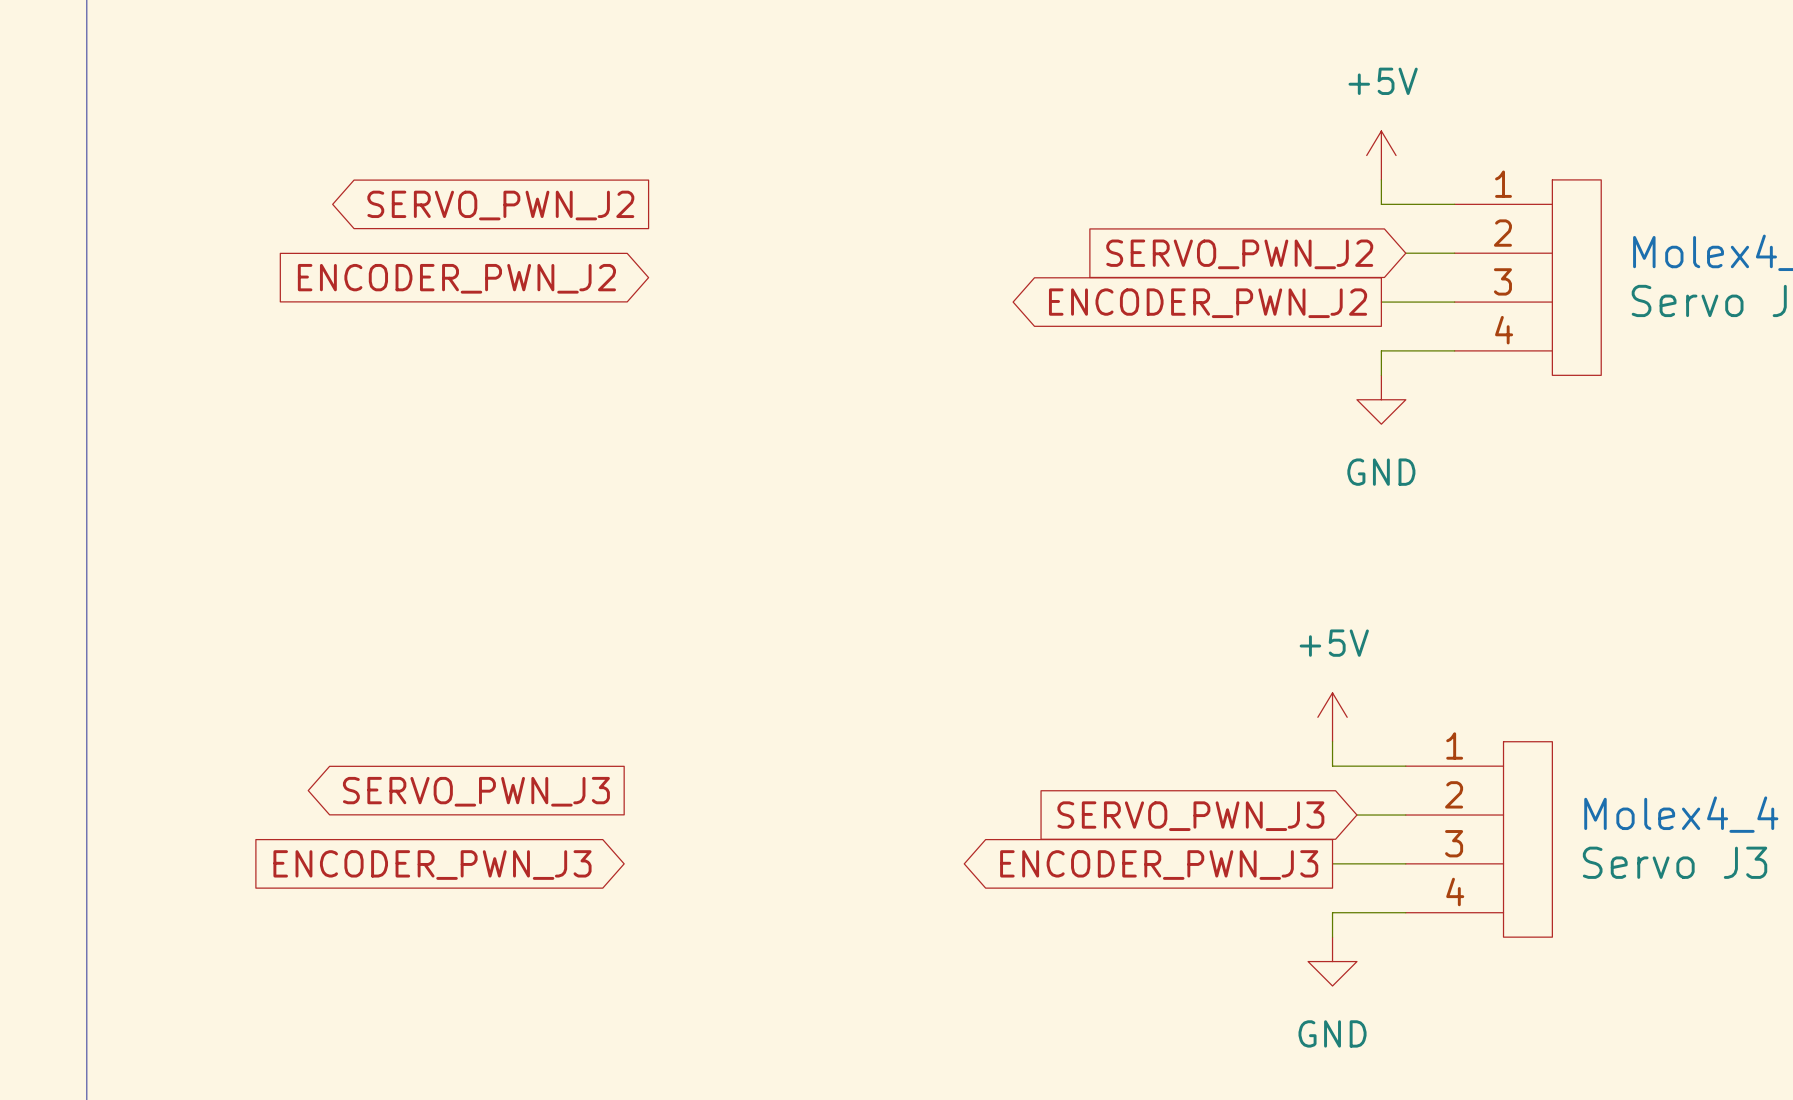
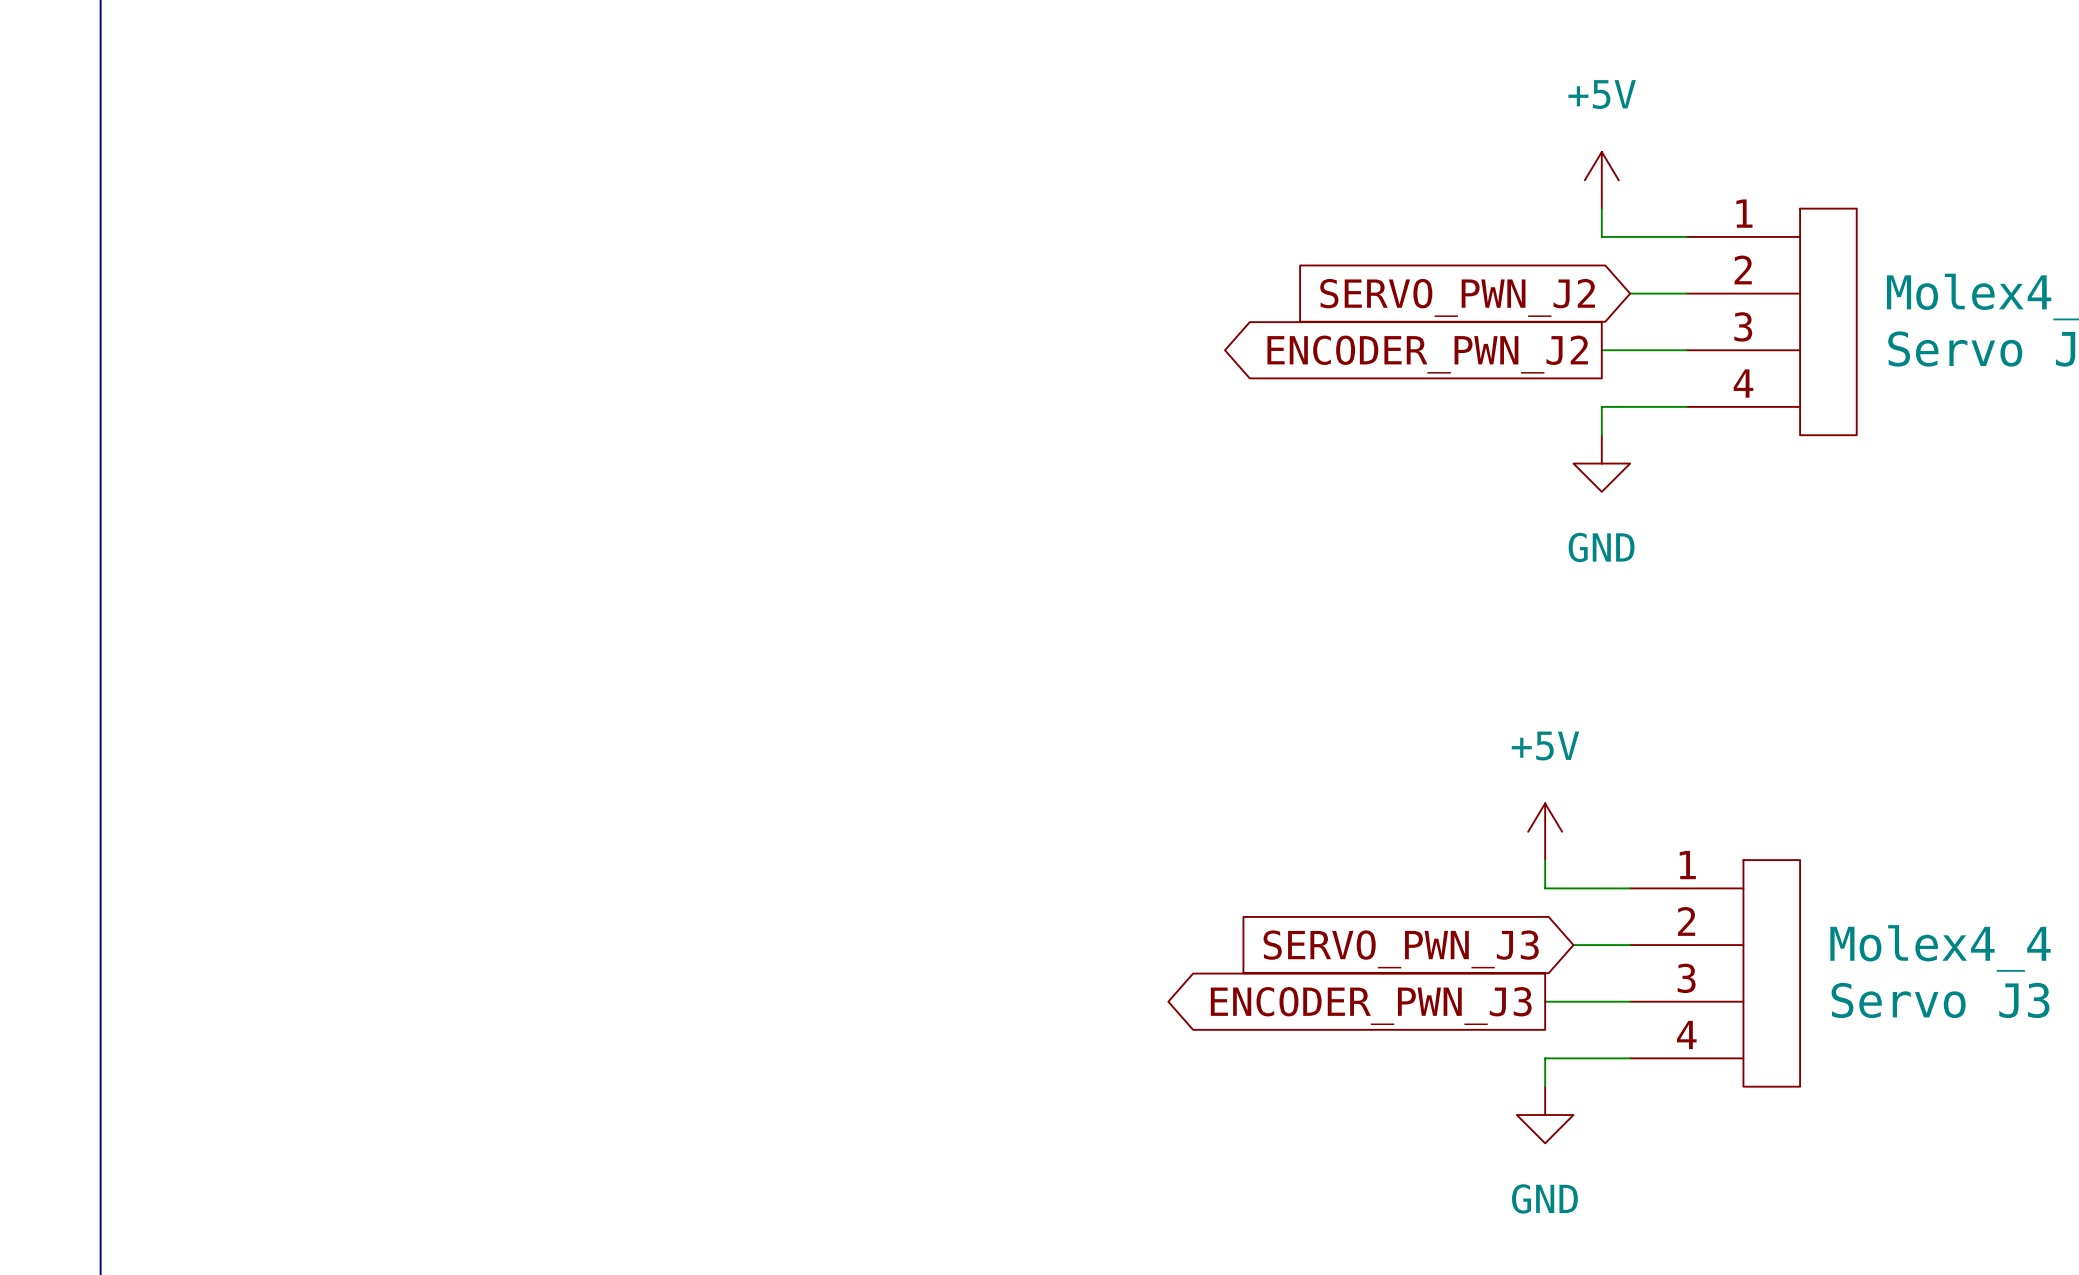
global label: SERVO_PWN_J2 (500, 205) -> none
global label: ENCODER_PWN_J2 (456, 278) -> none
global label: SERVO_PWN_J3 (476, 791) -> none
global label: ENCODER_PWN_J3 (432, 865) -> none

